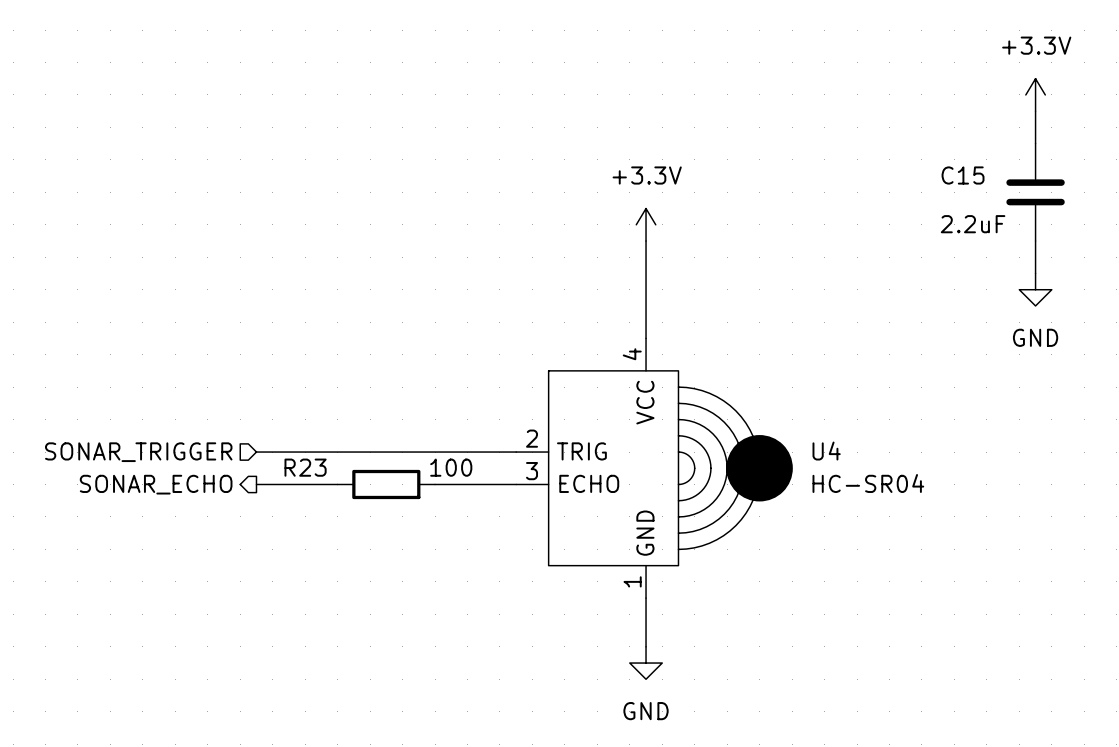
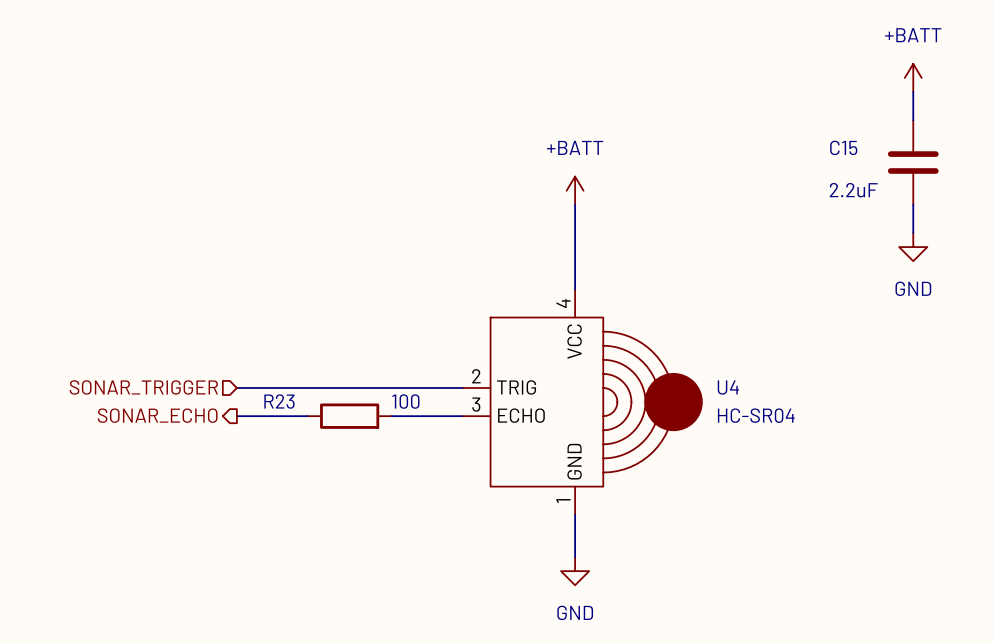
power symbol: +3.3V (1035, 94) -> +BATT (913, 77)
power symbol: +3.3V (646, 224) -> +BATT (575, 190)

